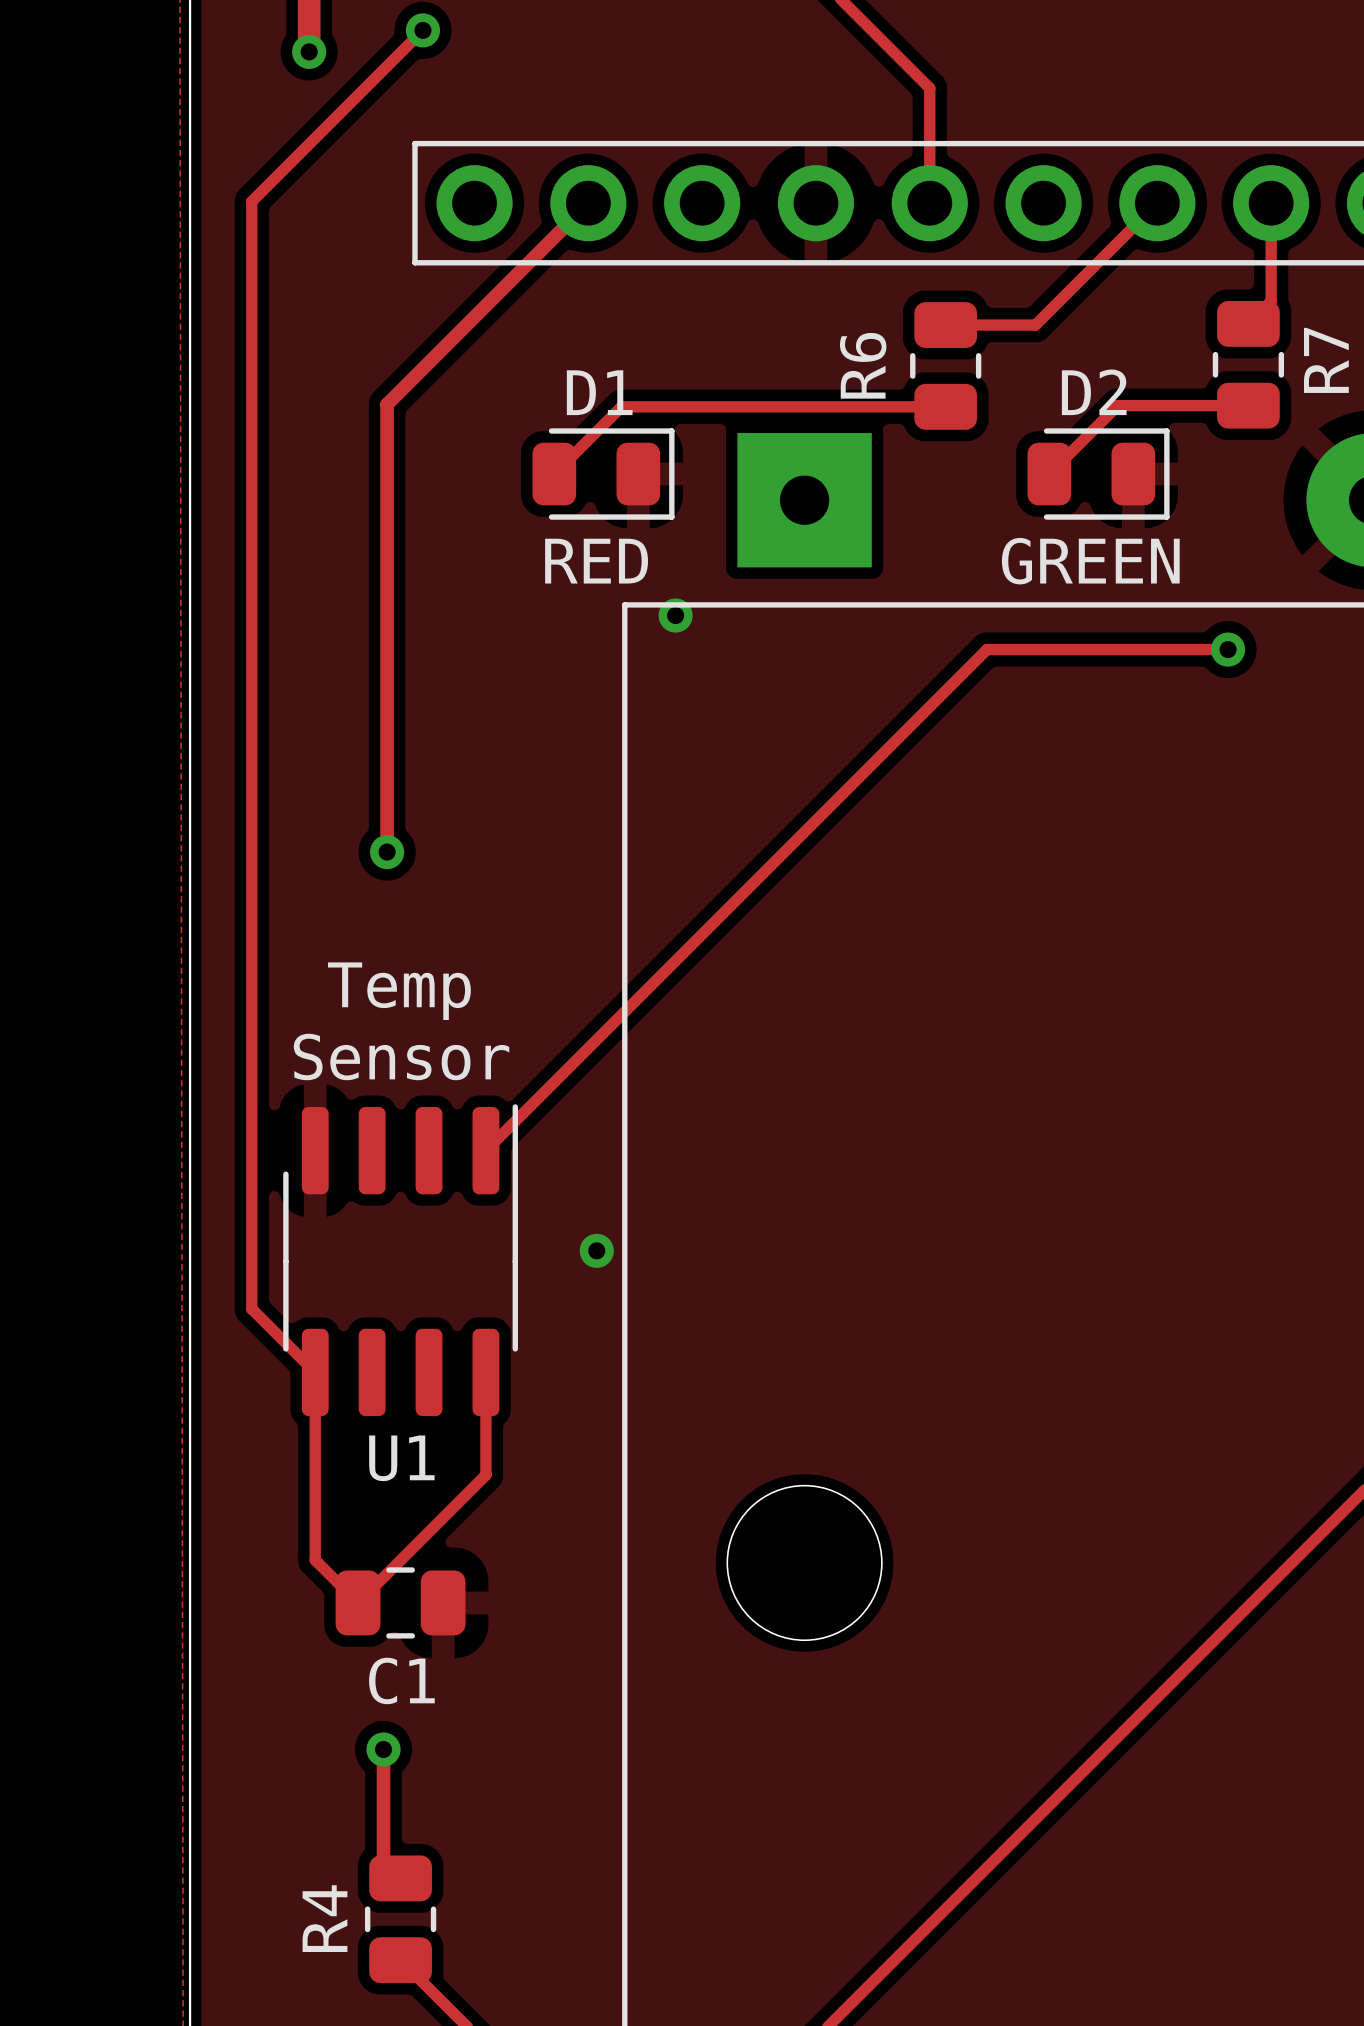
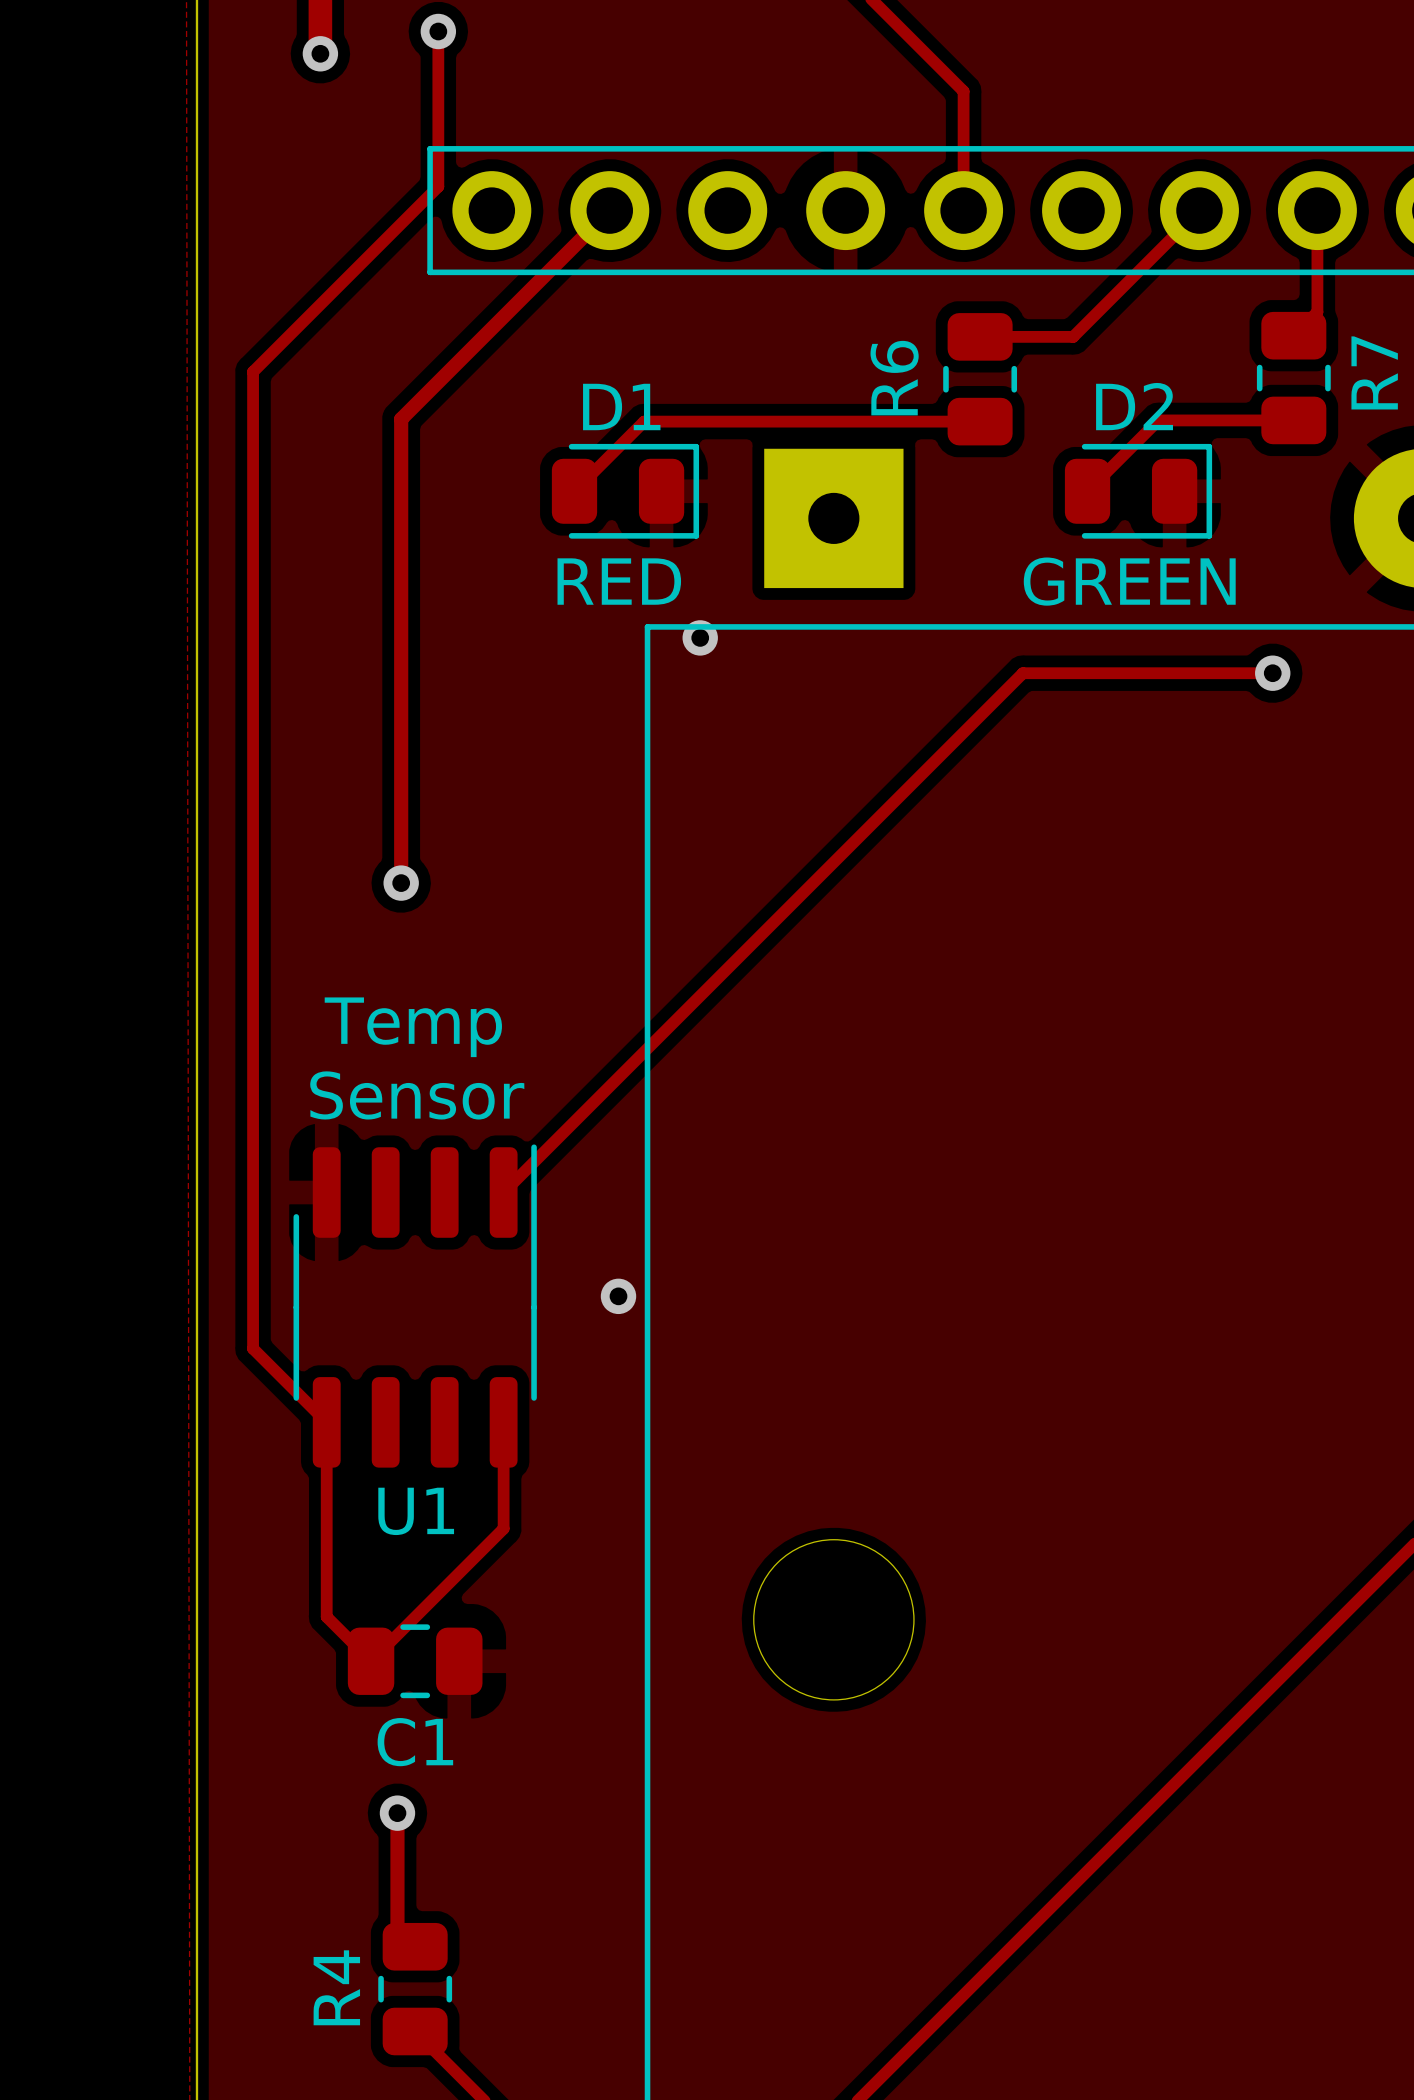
track: (422, 30) (251, 201) (251, 1308) -> (438, 31) (438, 186) (253, 371) (253, 1348) (260, 1356)

